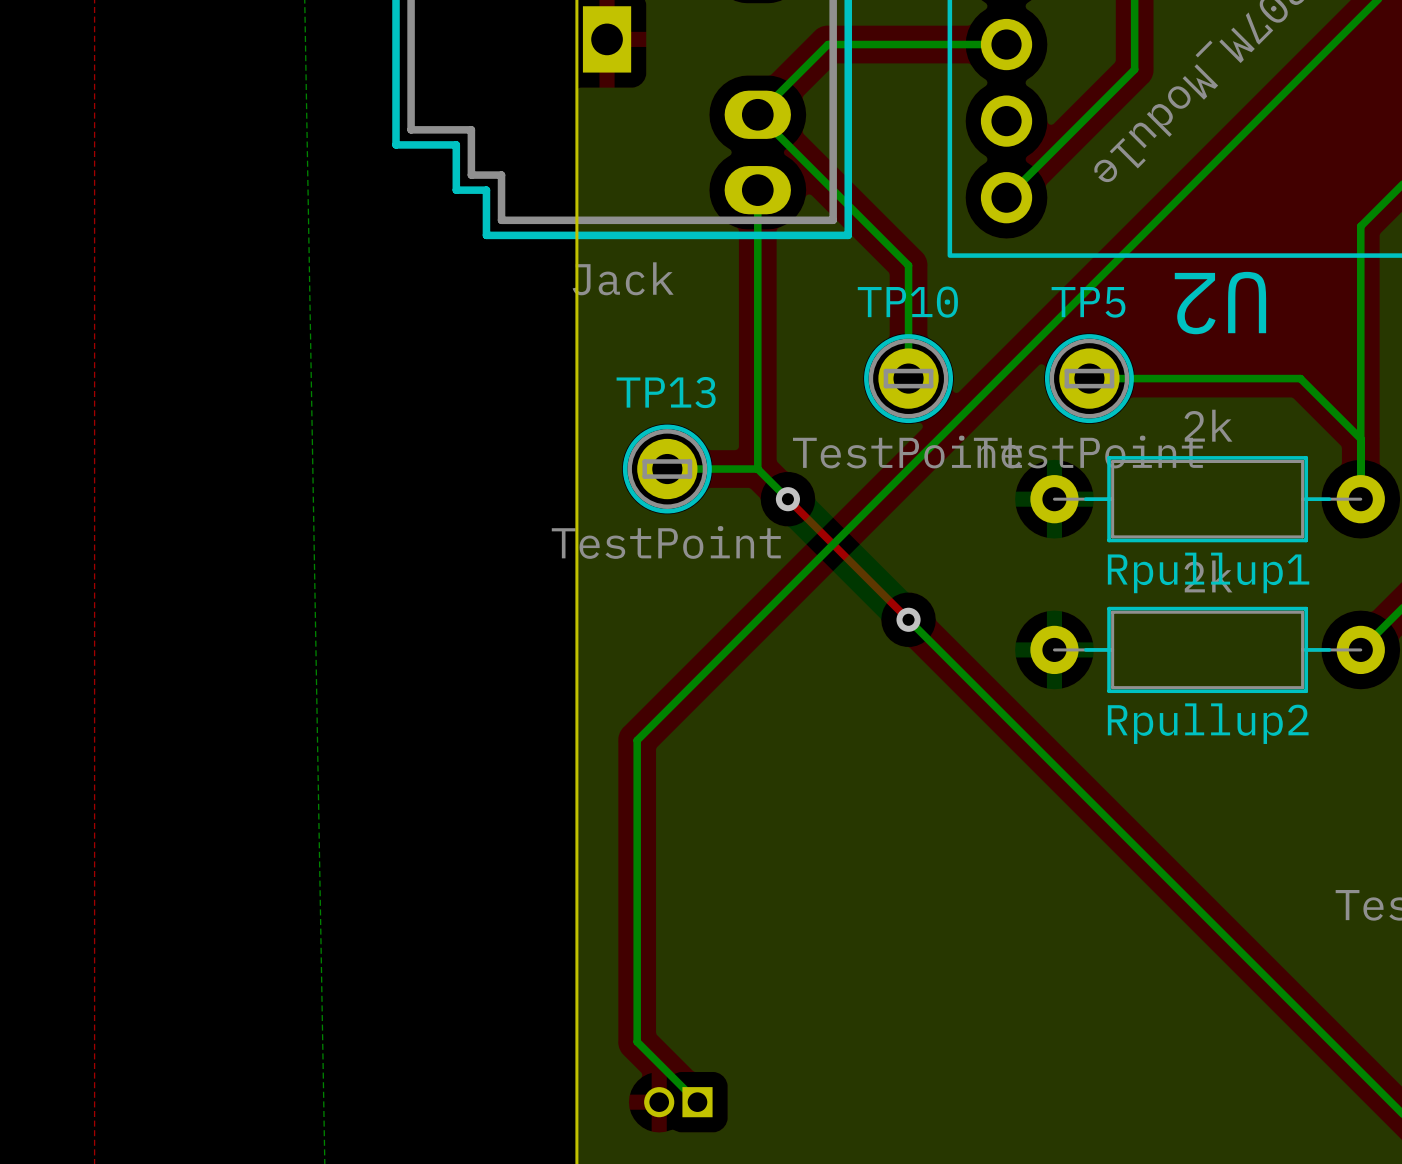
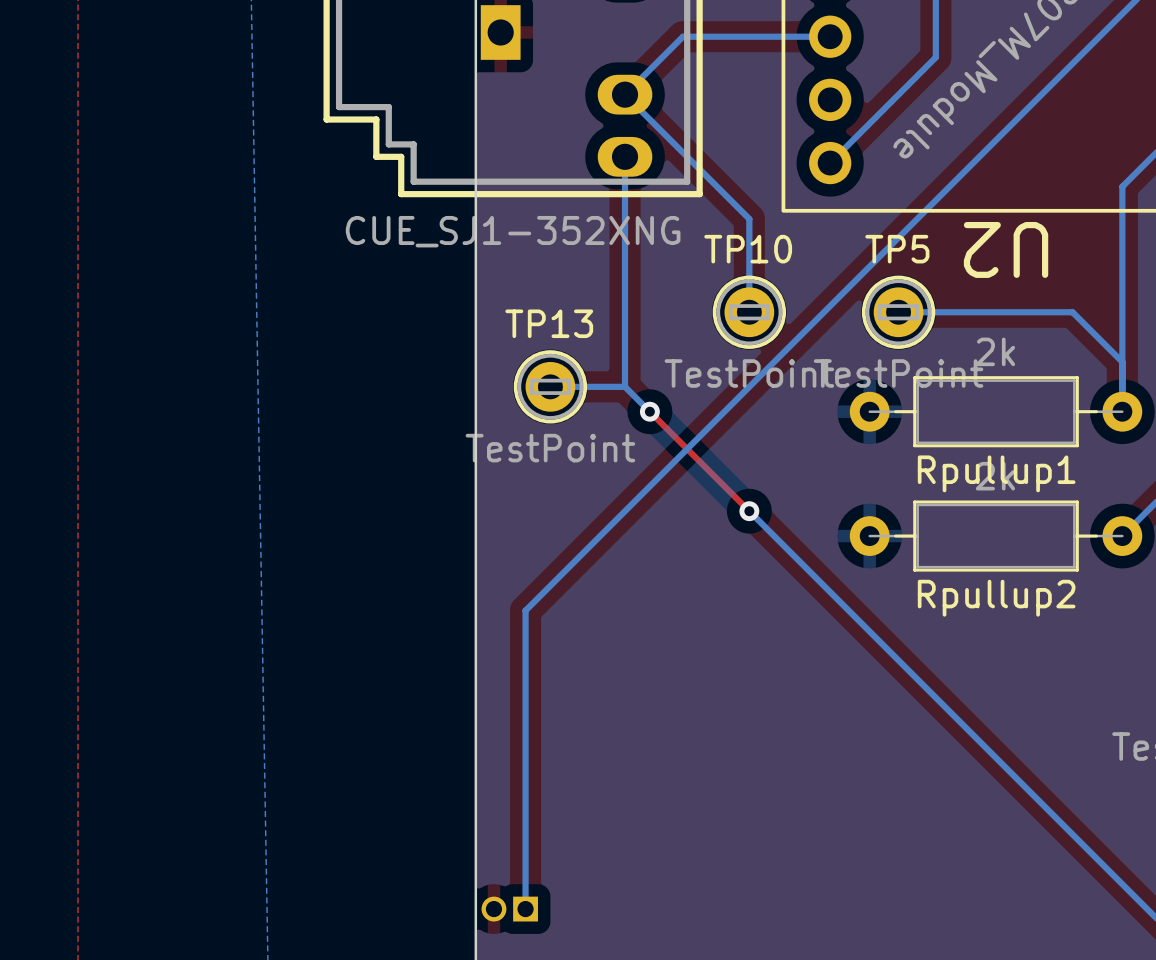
part value: Jack (623, 278) -> CUE_SJ1-352XNG (513, 231)
bottom track: (637, 1041) (697, 1102) -> (525, 859) (525, 909)
part position: (678, 1102) -> (509, 909)

